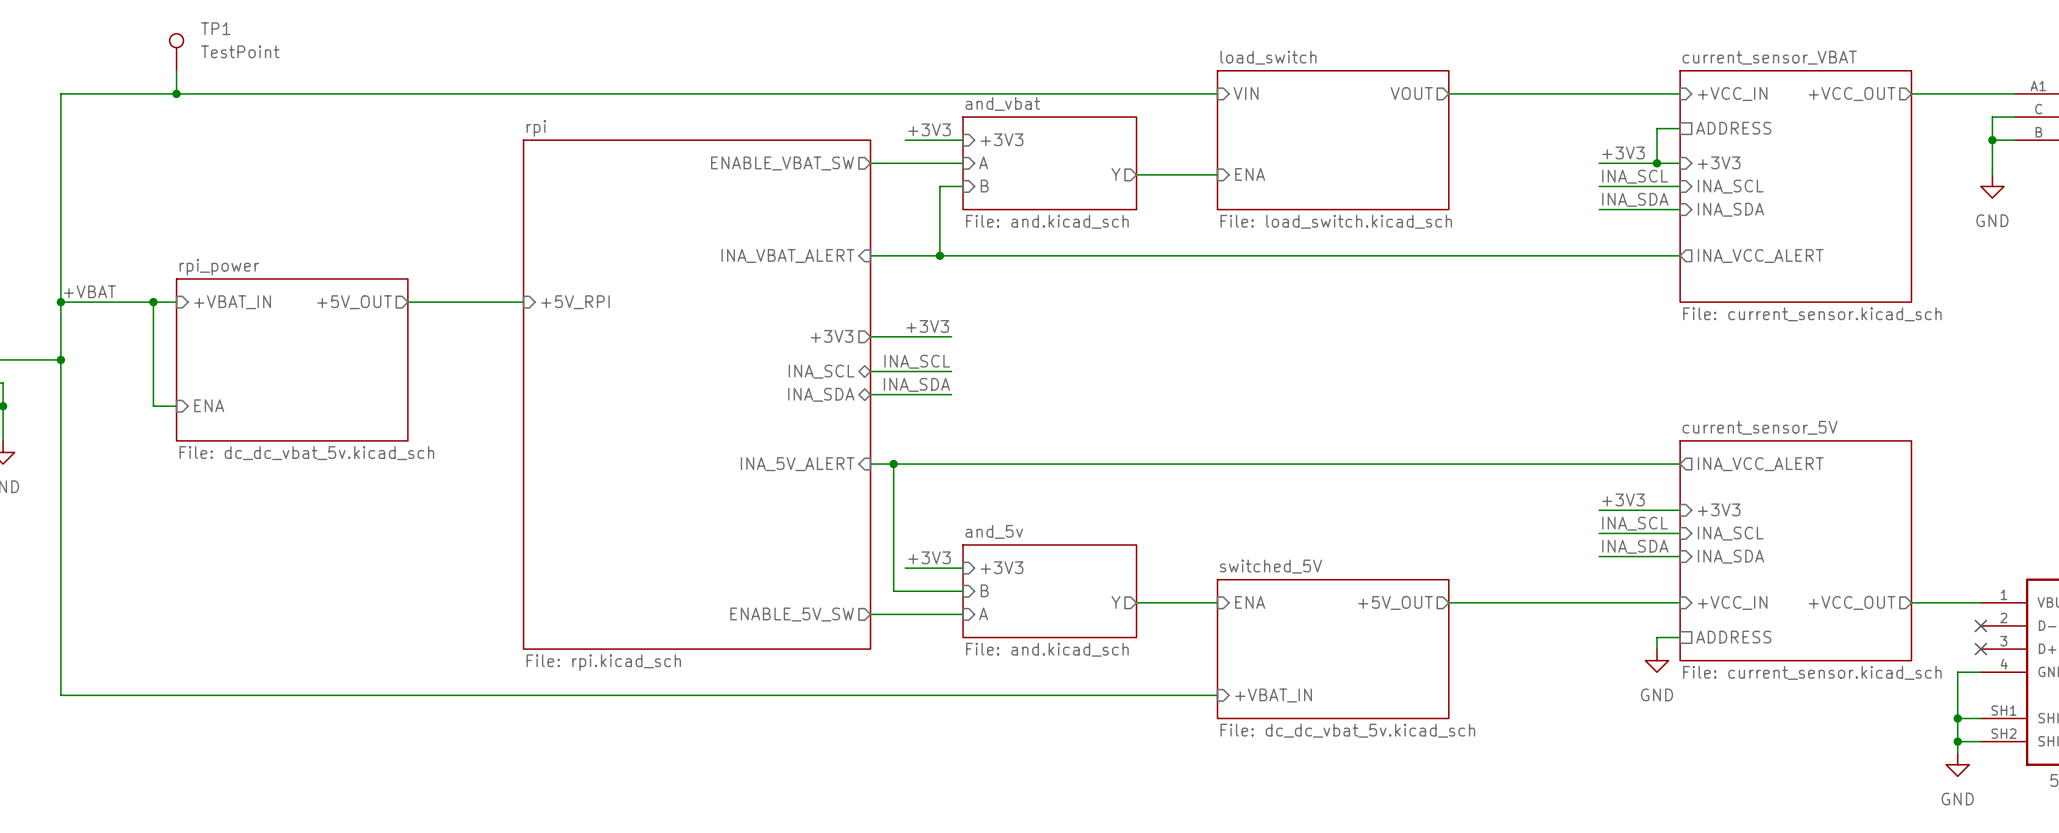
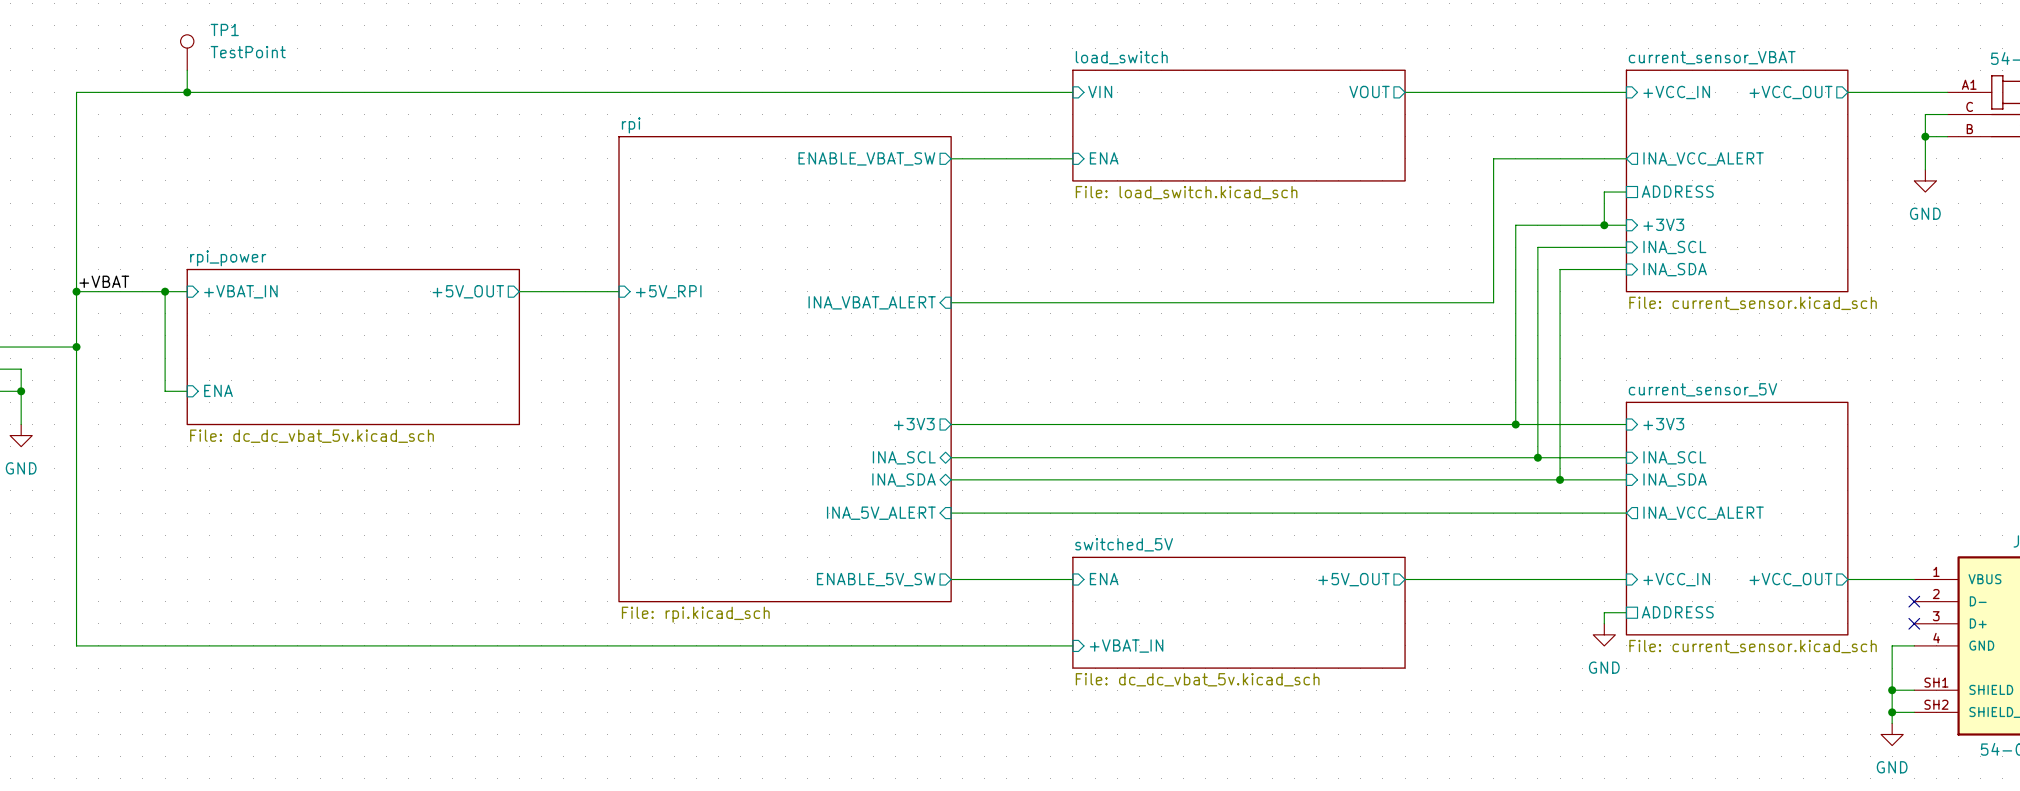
wire: (1101, 93) (1217, 93) -> none
sheet pin position: VIN (1246, 93) -> VIN (1100, 91)
sheet load_switch: none -> File: load_switch.kicad_sch (1238, 125)
wire: (1680, 128) (1657, 128) (1657, 163) -> (1626, 192) (1604, 192) (1604, 225)
sheet pin position: ADDRESS (1733, 128) -> ADDRESS (1677, 191)
label: +3V3 (929, 129) -> none
sheet pin: +3V3 (1002, 139) -> none
sheet load_switch: File: load_switch.kicad_sch (1333, 140) -> none
label: +3V3 (1623, 153) -> none
sheet pin: A (983, 162) -> none
sheet pin shape: input (1719, 162) -> output (1703, 158)
sheet pin: +3V3 (1719, 162) -> INA_VCC_ALERT (1703, 158)
sheet pin position: ENABLE_VBAT_SW (782, 163) -> ENABLE_VBAT_SW (866, 158)
wire: (870, 163) (963, 163) -> none
wire: none -> (951, 158) (1072, 158)
sheet and_vbat: File: and.kicad_sch (1049, 163) -> none
wire: none -> (1548, 158) (1493, 158) (1493, 302) (951, 302)
junction: (1657, 163) -> none
sheet pin: Y (1115, 174) -> none
wire: (1136, 174) (1217, 174) -> none
sheet pin position: ENA (1250, 174) -> ENA (1104, 158)
label: INA_SCL (1635, 176) -> none
wire: (963, 186) (939, 186) (939, 255) -> none
sheet pin: B (984, 186) -> none
wire: (1599, 186) (1680, 186) -> none
sheet pin: INA_SCL (1730, 186) -> none
label: INA_SDA (1635, 199) -> none
wire: (1599, 209) (1680, 209) -> none
sheet pin position: INA_SDA (1730, 209) -> INA_SDA (1675, 269)
junction: none -> (1604, 225)
wire: none -> (1626, 225) (1515, 225) (1515, 424)
sheet pin: none -> +3V3 (1663, 224)
sheet pin position: INA_VBAT_ALERT (788, 255) -> INA_VBAT_ALERT (872, 302)
wire: (870, 255) (1587, 255) -> (1537, 457) (1537, 247)
junction: (939, 255) -> none
sheet pin shape: output (1760, 255) -> input (1674, 247)
sheet pin: INA_VCC_ALERT (1760, 255) -> INA_SCL (1674, 247)
wire: none -> (1626, 269) (1560, 269) (1560, 479)
sheet pin position: +5V_OUT (354, 302) -> +5V_OUT (468, 291)
wire: (407, 302) (523, 302) -> (619, 291) (519, 291)
sheet pin position: +5V_RPI (575, 302) -> +5V_RPI (668, 291)
label: +3V3 (927, 326) -> none
sheet pin: +3V3 (832, 336) -> none
wire: (870, 336) (951, 336) -> none
sheet rpi_power: File: dc_dc_vbat_5v.kicad_sch (292, 359) -> none
sheet rpi_power: none -> File: dc_dc_vbat_5v.kicad_sch (353, 347)
label: INA_SCL (917, 361) -> none
sheet pin position: INA_SCL (821, 371) -> INA_SCL (904, 457)
wire: (870, 371) (951, 371) -> none
sheet rpi: none -> File: rpi.kicad_sch (785, 369)
label: INA_SDA (916, 384) -> none
sheet rpi: File: rpi.kicad_sch (697, 394) -> none
sheet pin position: INA_SDA (821, 394) -> INA_SDA (904, 479)
wire: (870, 394) (951, 394) -> none
sheet pin: none -> +3V3 (914, 424)
wire: none -> (951, 424) (1626, 424)
junction: none -> (1515, 424)
sheet current_sensor_5V shape: [1679, 440, 1913, 662] -> [1625, 401, 1849, 636]
sheet pin position: INA_5V_ALERT (797, 464) -> INA_5V_ALERT (881, 513)
wire: (870, 464) (1680, 464) -> none
wire: (893, 464) (893, 591) (963, 591) -> none
junction: (893, 464) -> none
sheet pin: INA_VCC_ALERT (1760, 464) -> none
wire: none -> (951, 457) (1626, 457)
junction: none -> (1537, 457)
sheet pin: none -> INA_SCL (1674, 457)
wire: none -> (951, 479) (1626, 479)
junction: none -> (1560, 479)
label: +3V3 (1623, 499) -> none
sheet pin position: +3V3 (1719, 509) -> +3V3 (1663, 424)
wire: (1599, 510) (1680, 510) -> none
label: INA_SCL (1635, 523) -> none
wire: none -> (951, 513) (1548, 513)
sheet pin shape: input (1730, 533) -> output (1703, 513)
sheet pin: INA_SCL (1730, 533) -> INA_VCC_ALERT (1703, 513)
label: INA_SDA (1635, 546) -> none
wire: (1599, 556) (1680, 556) -> none
sheet pin position: INA_SDA (1730, 556) -> INA_SDA (1675, 479)
label: +3V3 (929, 557) -> none
sheet switched_5V name position: switched_5V (1271, 566) -> switched_5V (1124, 544)
sheet pin: +3V3 (1002, 567) -> none
wire: (905, 568) (963, 568) -> none
sheet switched_5V shape: [1216, 579, 1450, 720] -> [1072, 556, 1406, 669]
sheet pin: B (984, 590) -> none
sheet and_5v: File: and.kicad_sch (1049, 591) -> none
wire: none -> (951, 579) (1072, 579)
sheet pin: Y (1115, 602) -> none
wire: (1136, 602) (1217, 602) -> none
sheet pin position: ENA (1250, 602) -> ENA (1104, 579)
sheet pin: A (983, 613) -> none
sheet pin position: ENABLE_5V_SW (792, 614) -> ENABLE_5V_SW (876, 579)
wire: (870, 614) (963, 614) -> none
wire: (60, 672) (60, 695) (1217, 695) -> (76, 645) (1072, 645)
sheet pin position: +VBAT_IN (1273, 695) -> +VBAT_IN (1126, 646)
sheet switched_5V value position: File: dc_dc_vbat_5v.kicad_sch (1347, 730) -> File: dc_dc_vbat_5v.kicad_sch (1197, 679)

